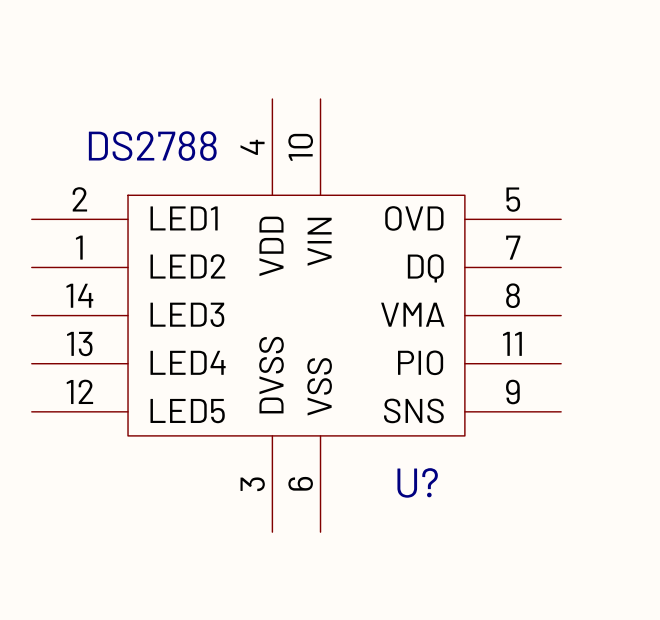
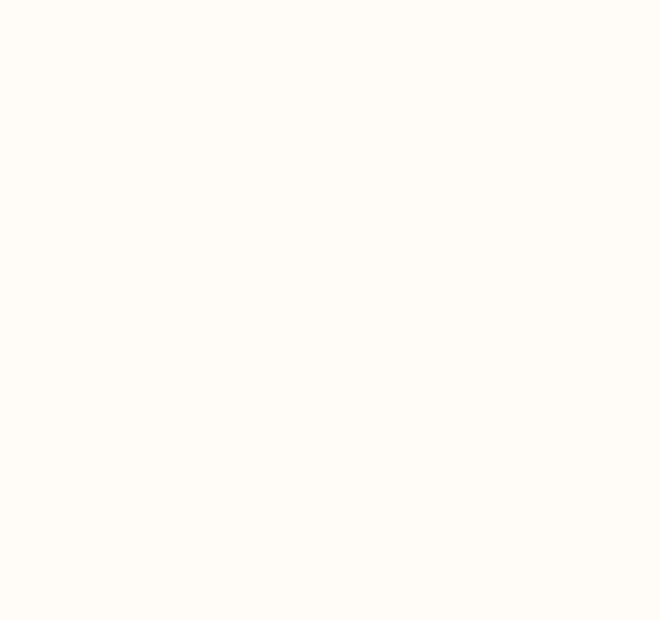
U?: DS2788 (296, 315) -> none

